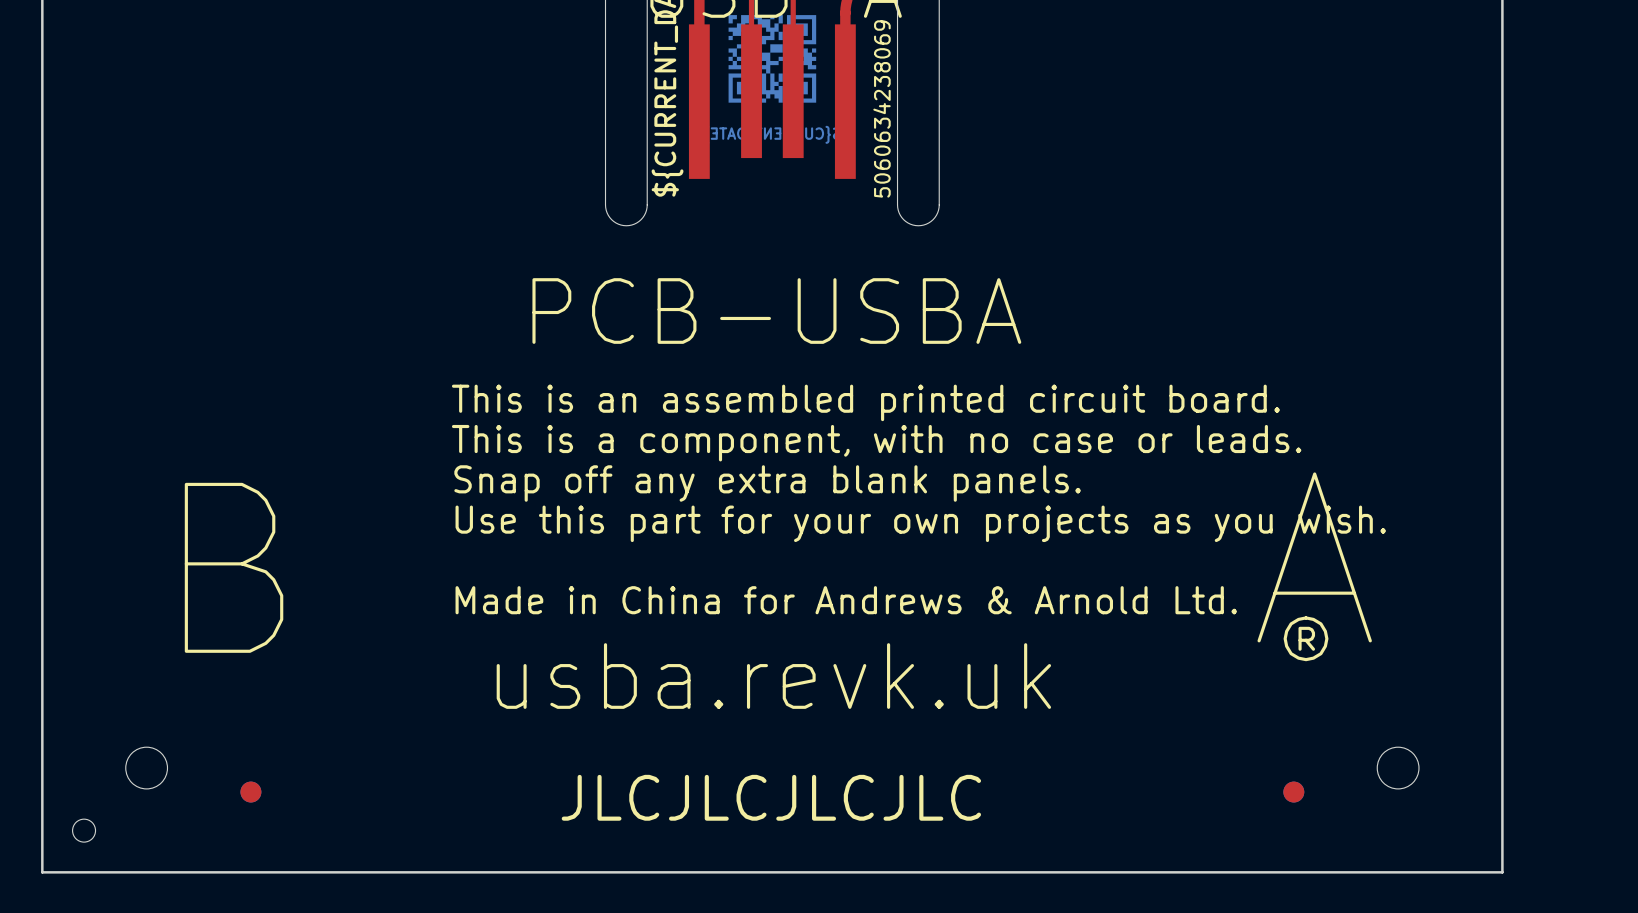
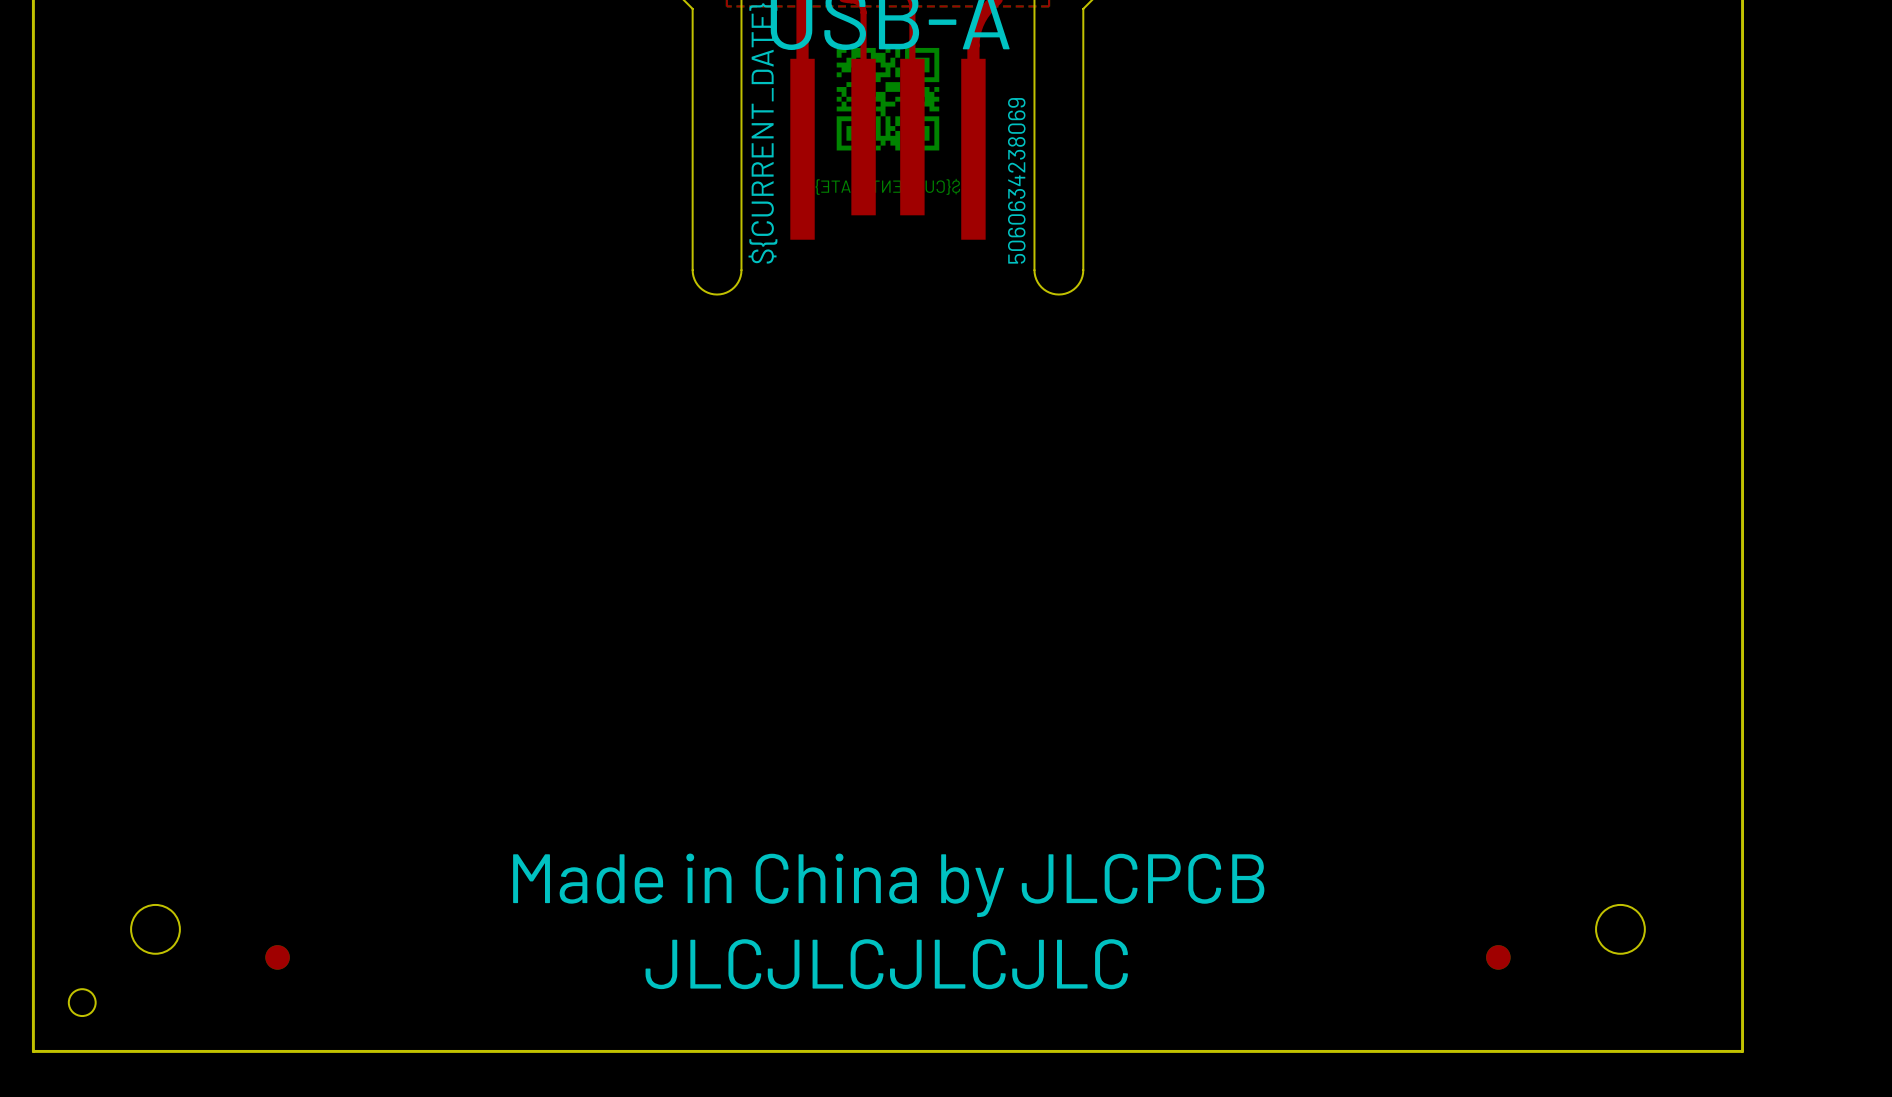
text: PCB-USBA (776, 311) -> none
text: This is an assembled printed circuit board. (865, 402) -> none
text: This is a component, with no case or leads. (876, 443) -> none
text: Snap off any extra blank panels. (767, 483) -> none
text: Use this part for your own projects as you wish. (920, 523) -> none
text: A (1314, 557) -> none
text: B (234, 567) -> none
text: Made in China for Andrews & Arnold Ltd. (846, 600) -> none
text: ® (1306, 638) -> none
text: usba.revk.uk (773, 676) -> none
text: none -> Made in China by JLCPCB (888, 885)

